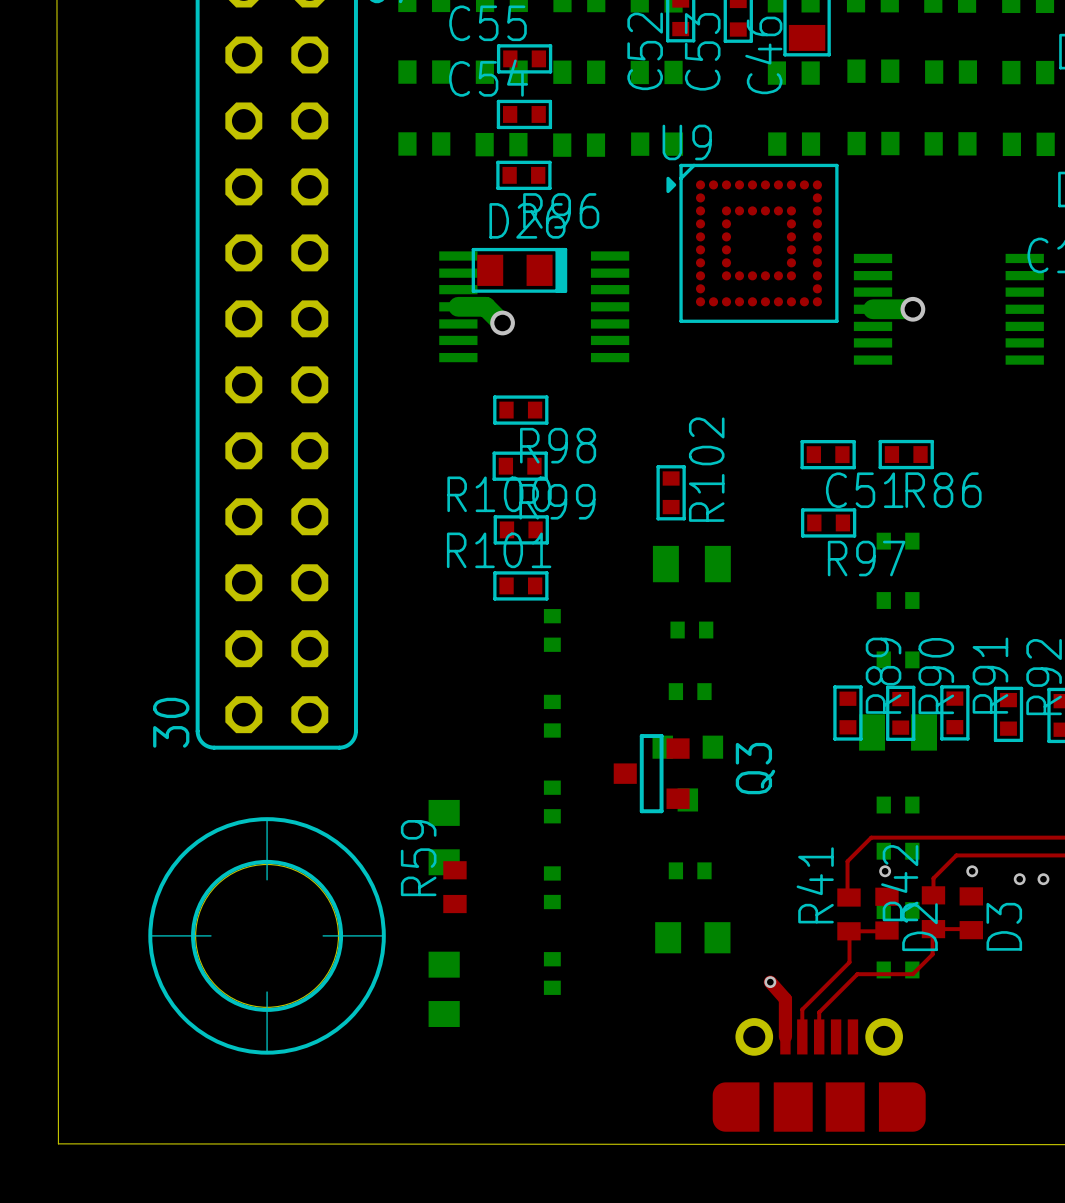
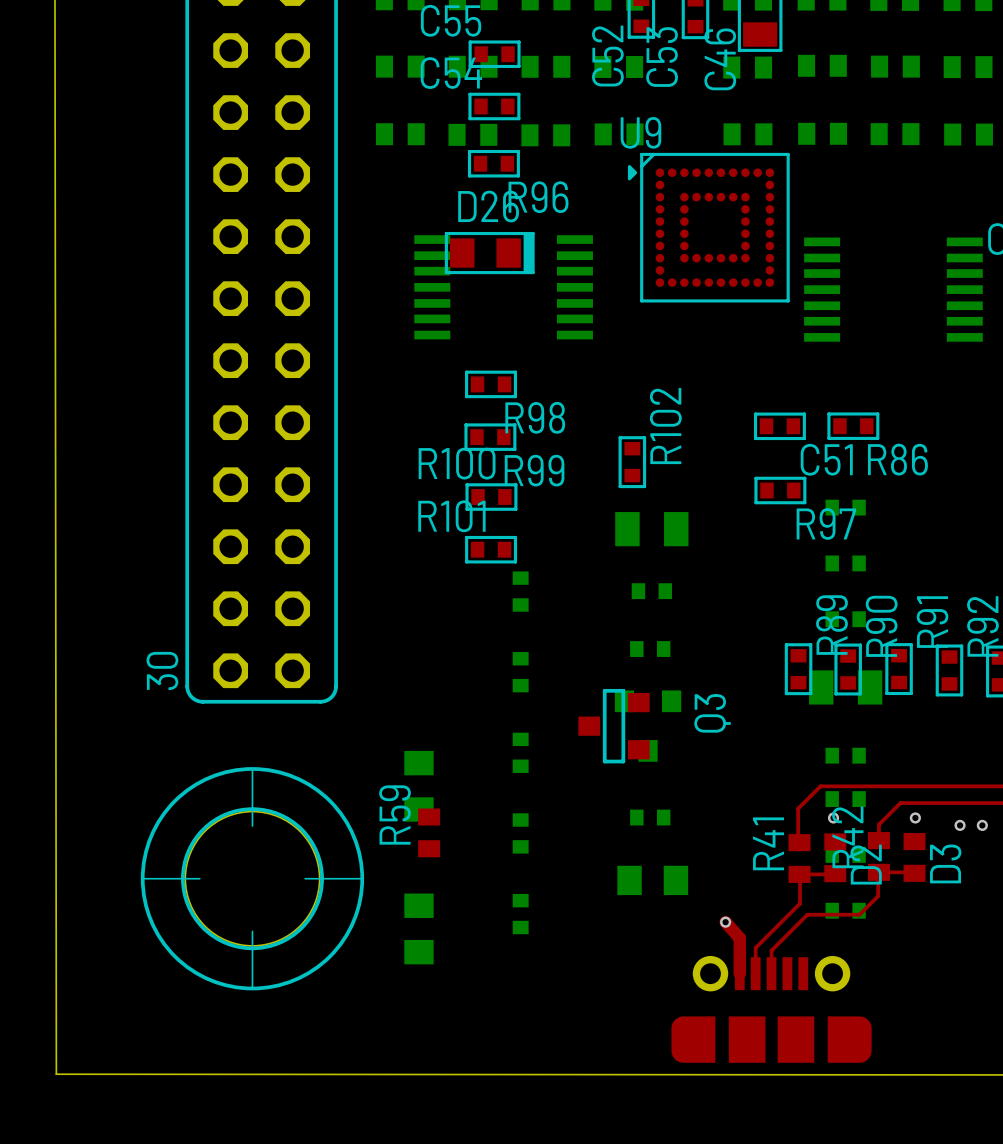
bottom track: (458, 306) (485, 306) (502, 323) -> none
bottom track: (873, 309) (913, 309) -> none
via: (912, 309) -> none
via: (502, 322) -> none

